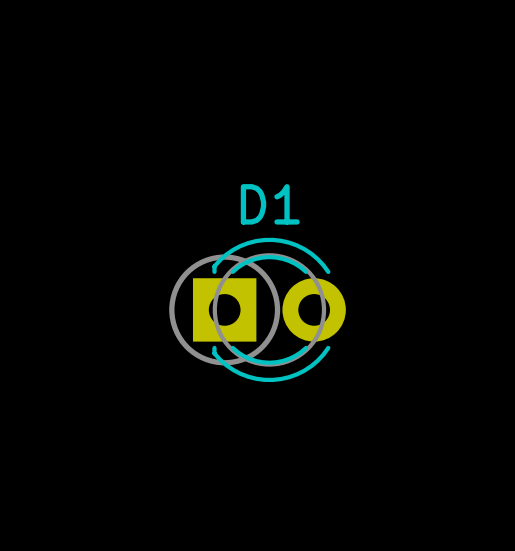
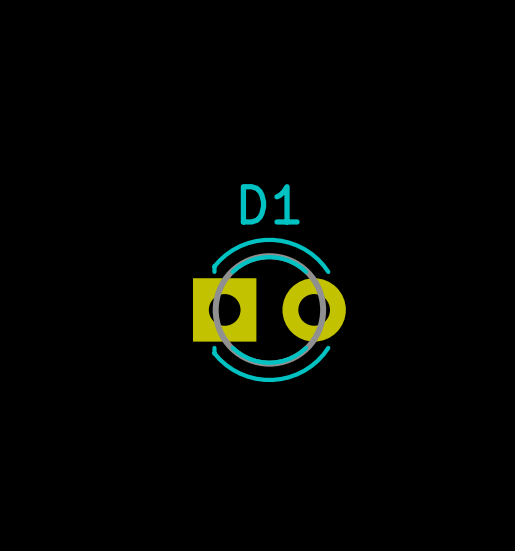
D1 footprint: [169, 237, 346, 383] -> [192, 237, 346, 383]

